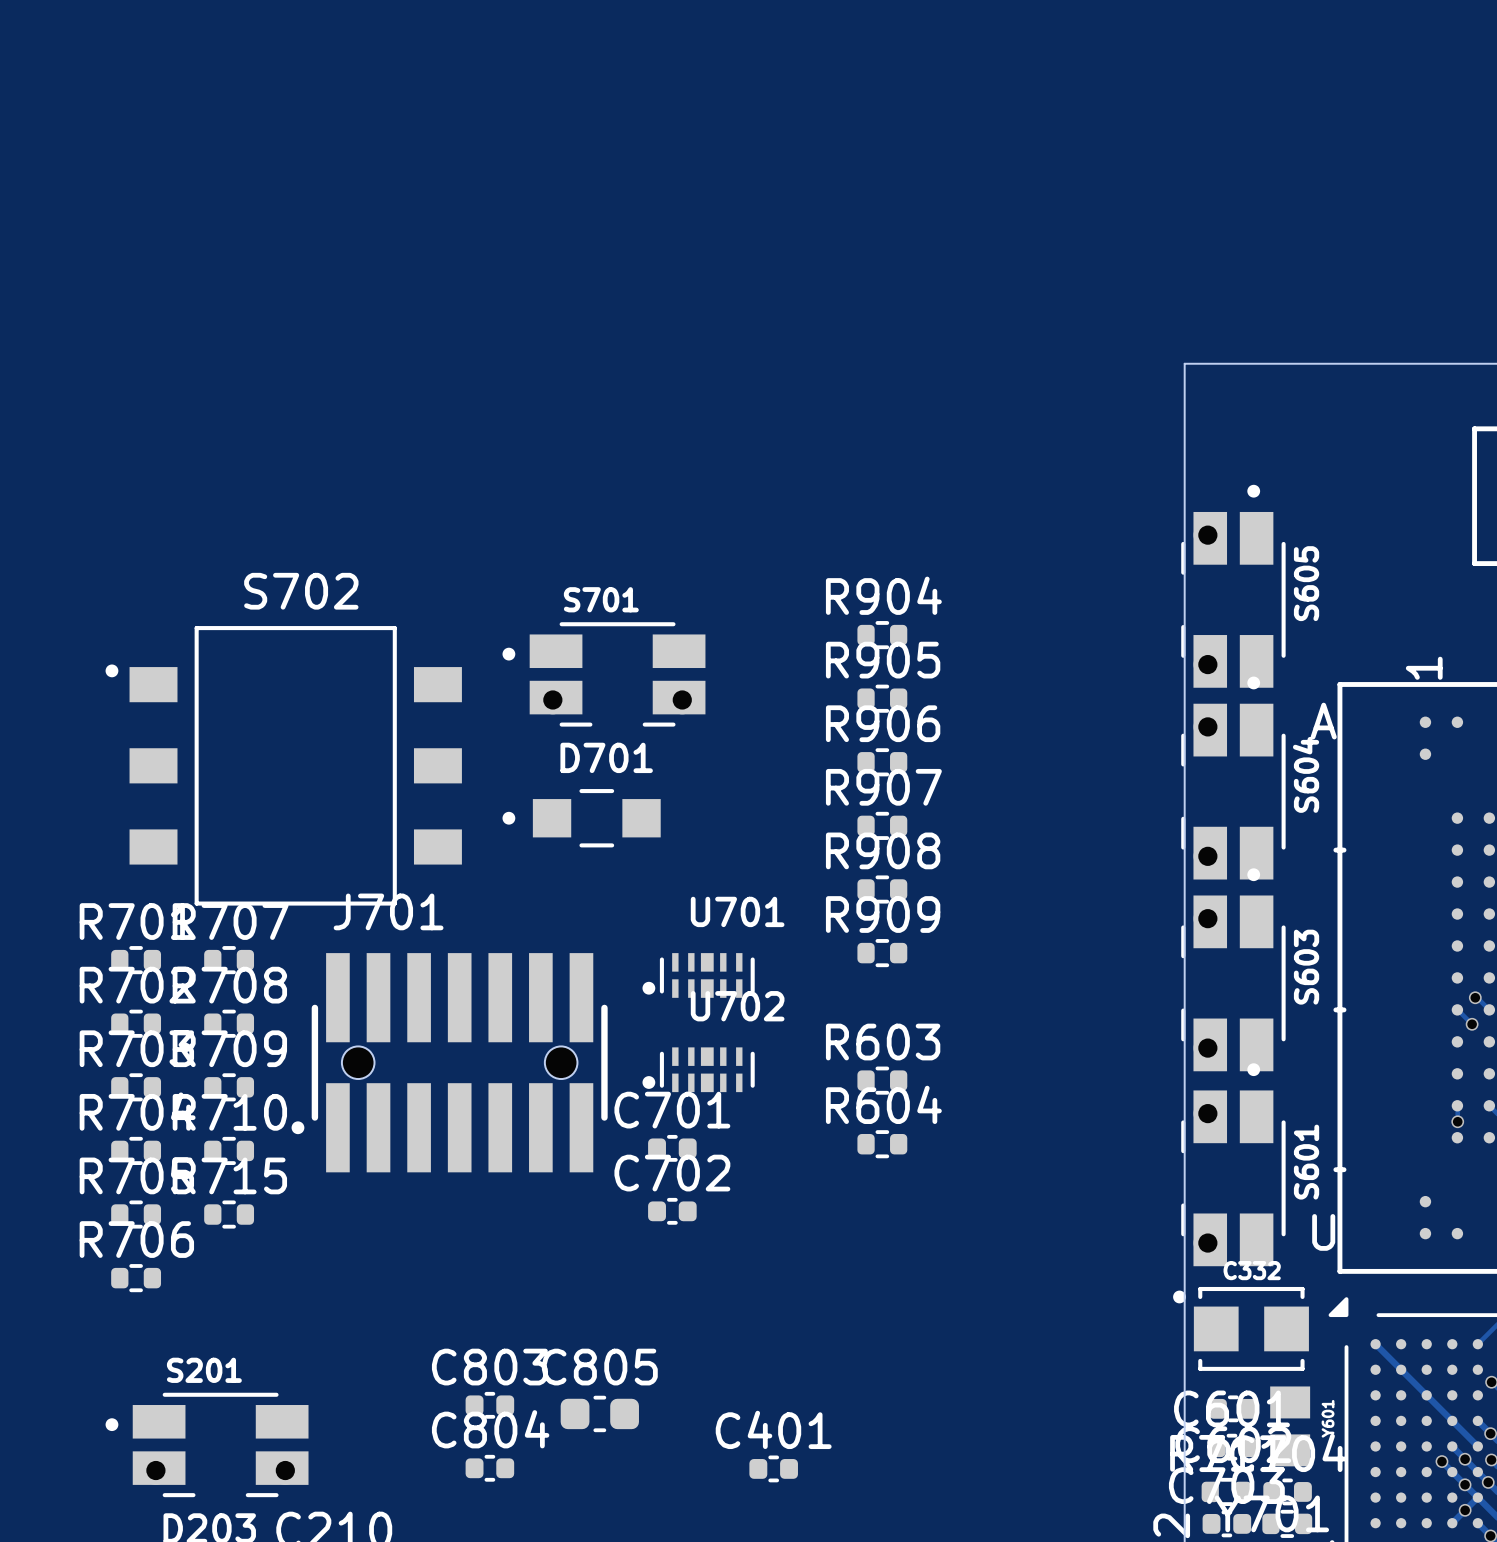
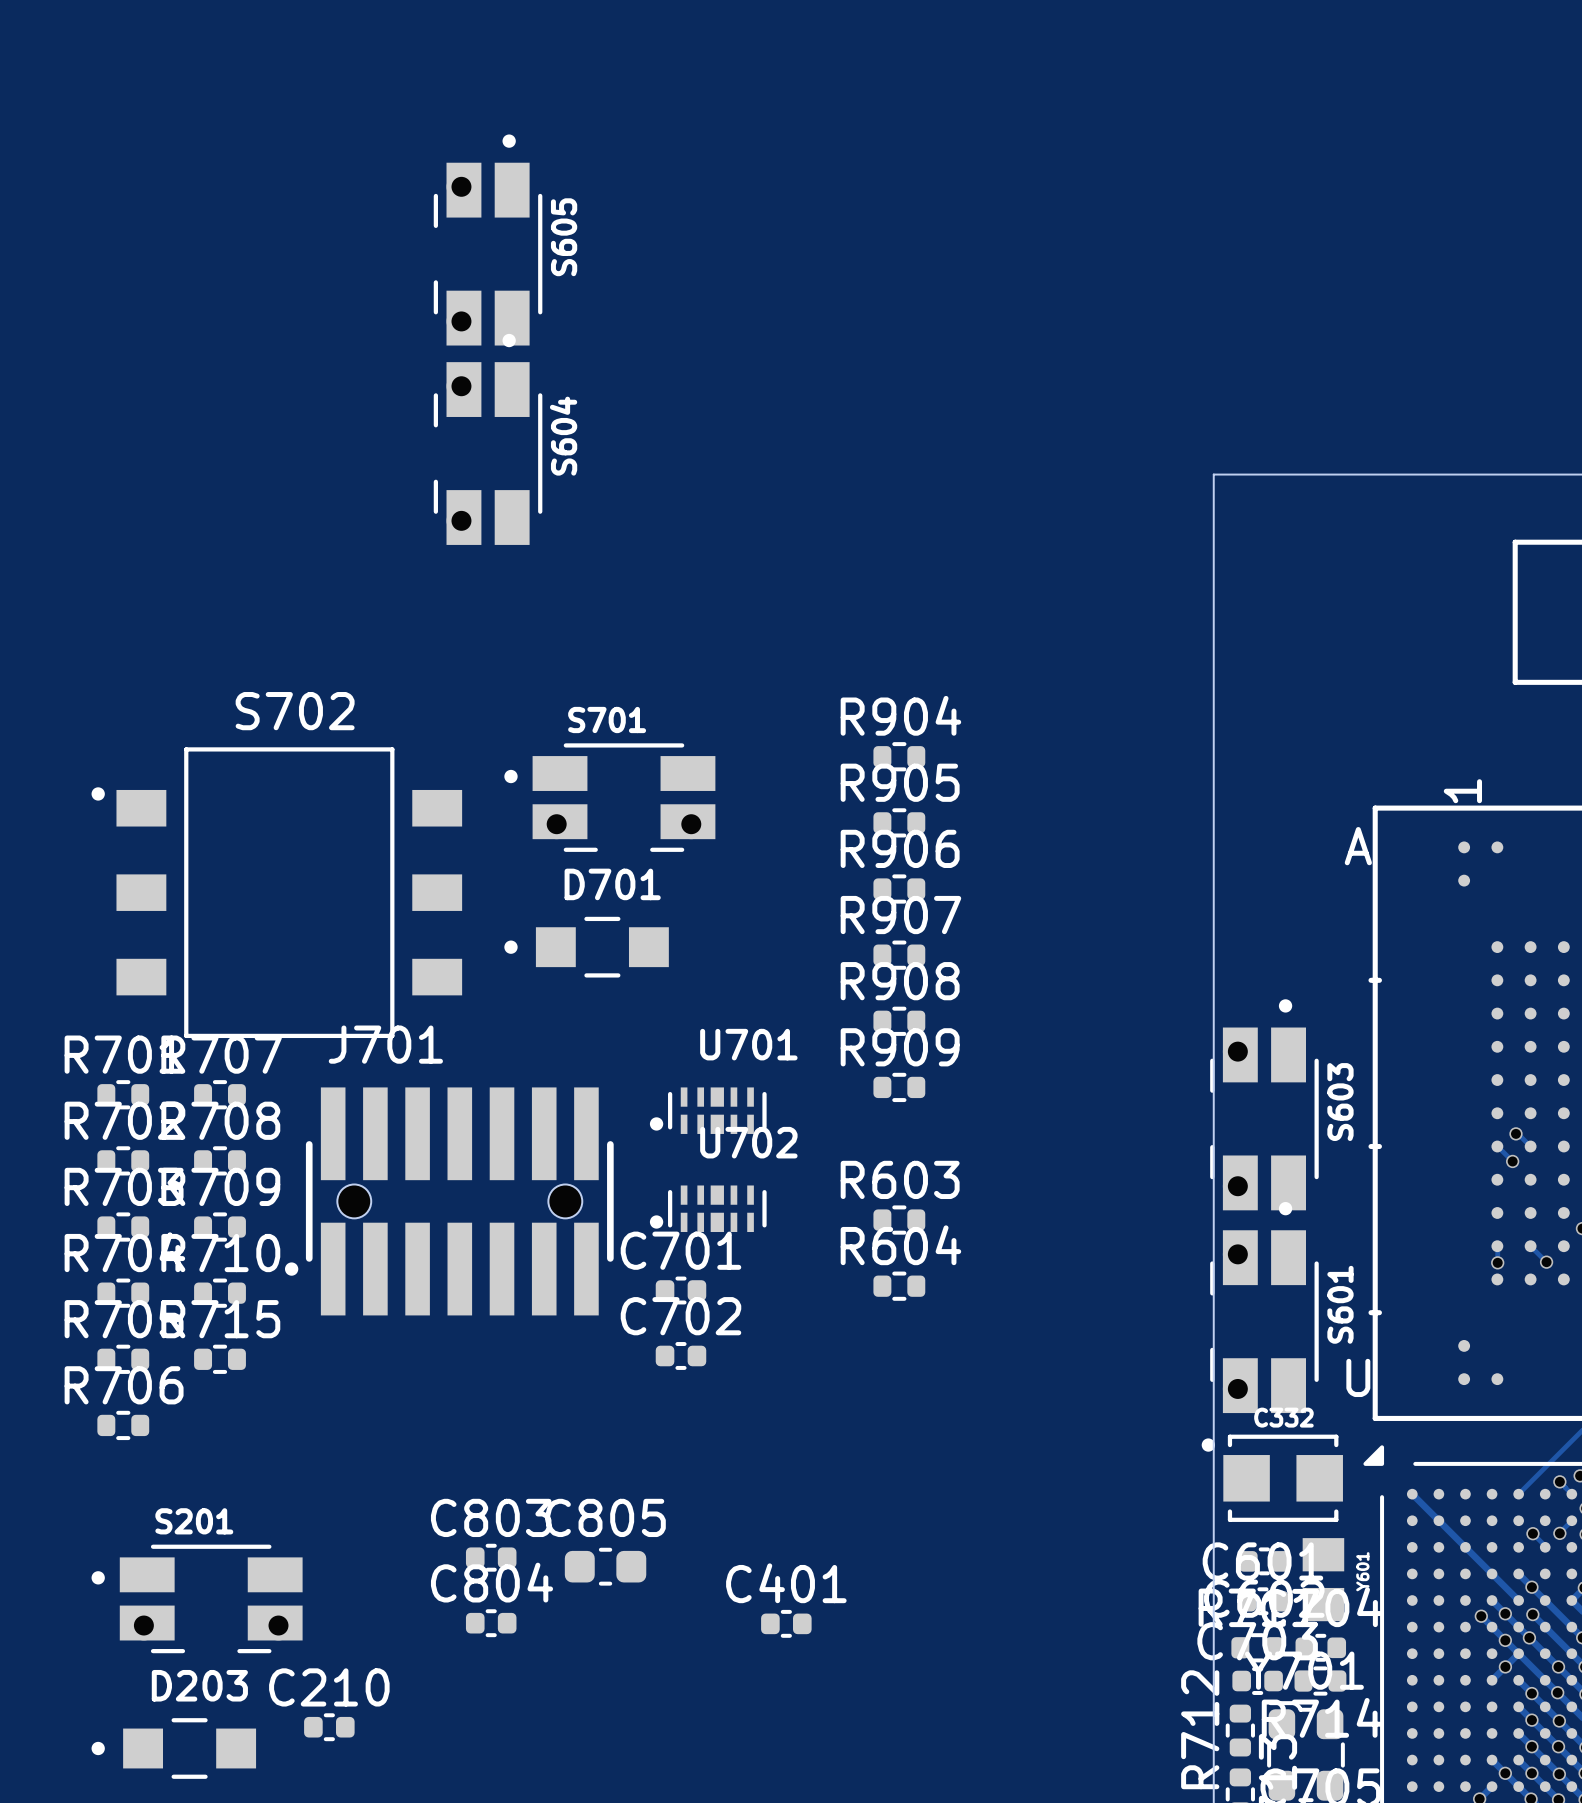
S605 position: (1233, 586) -> (488, 239)
S604 position: (1233, 778) -> (488, 439)

